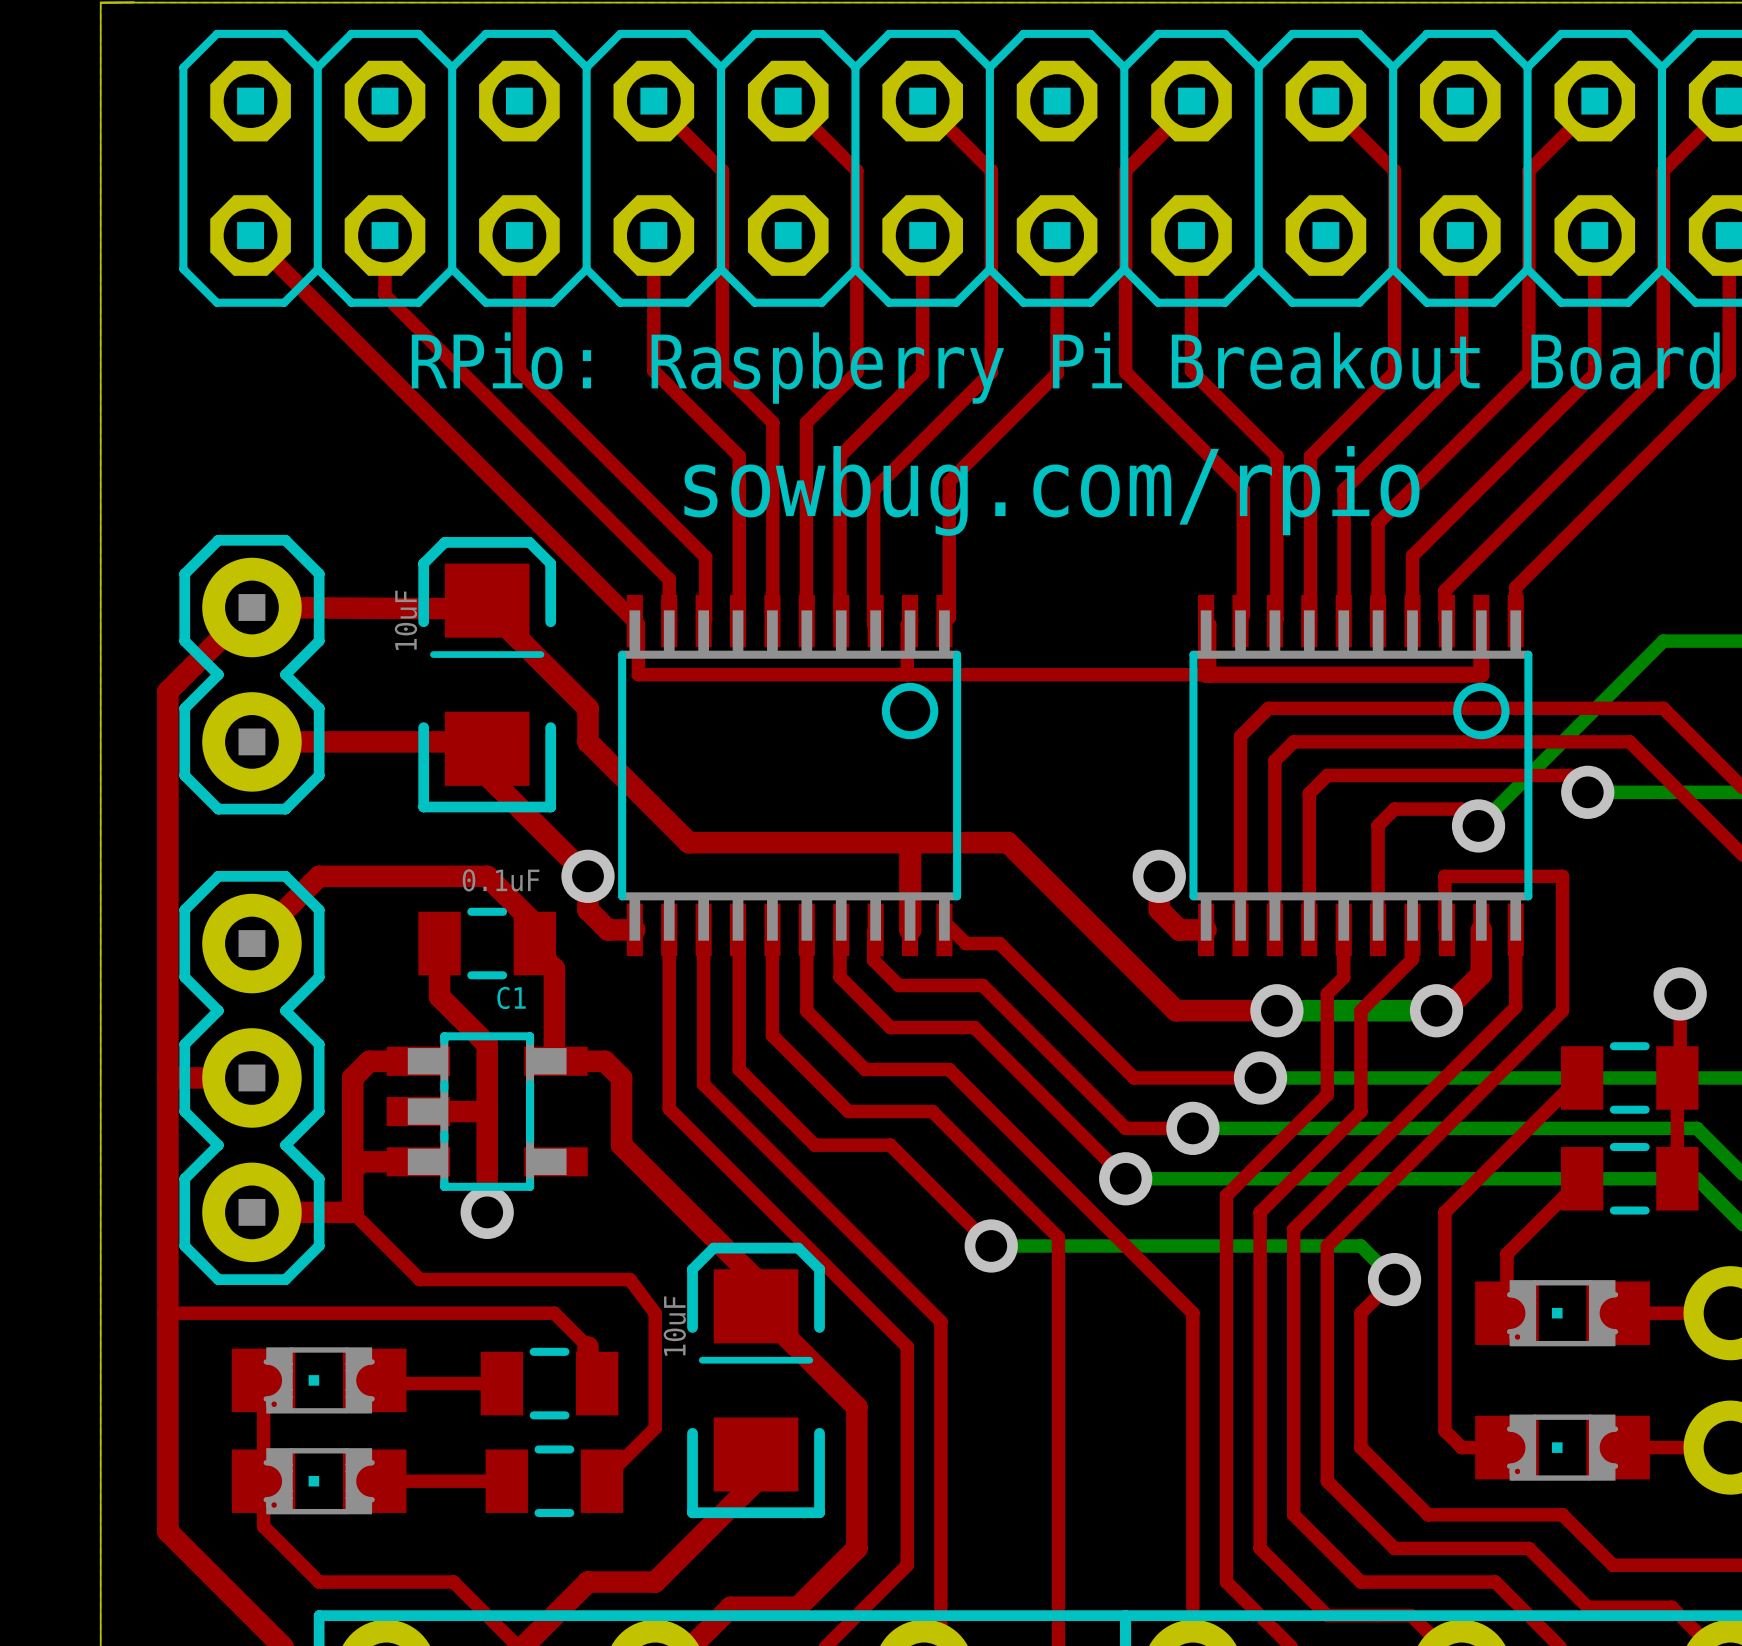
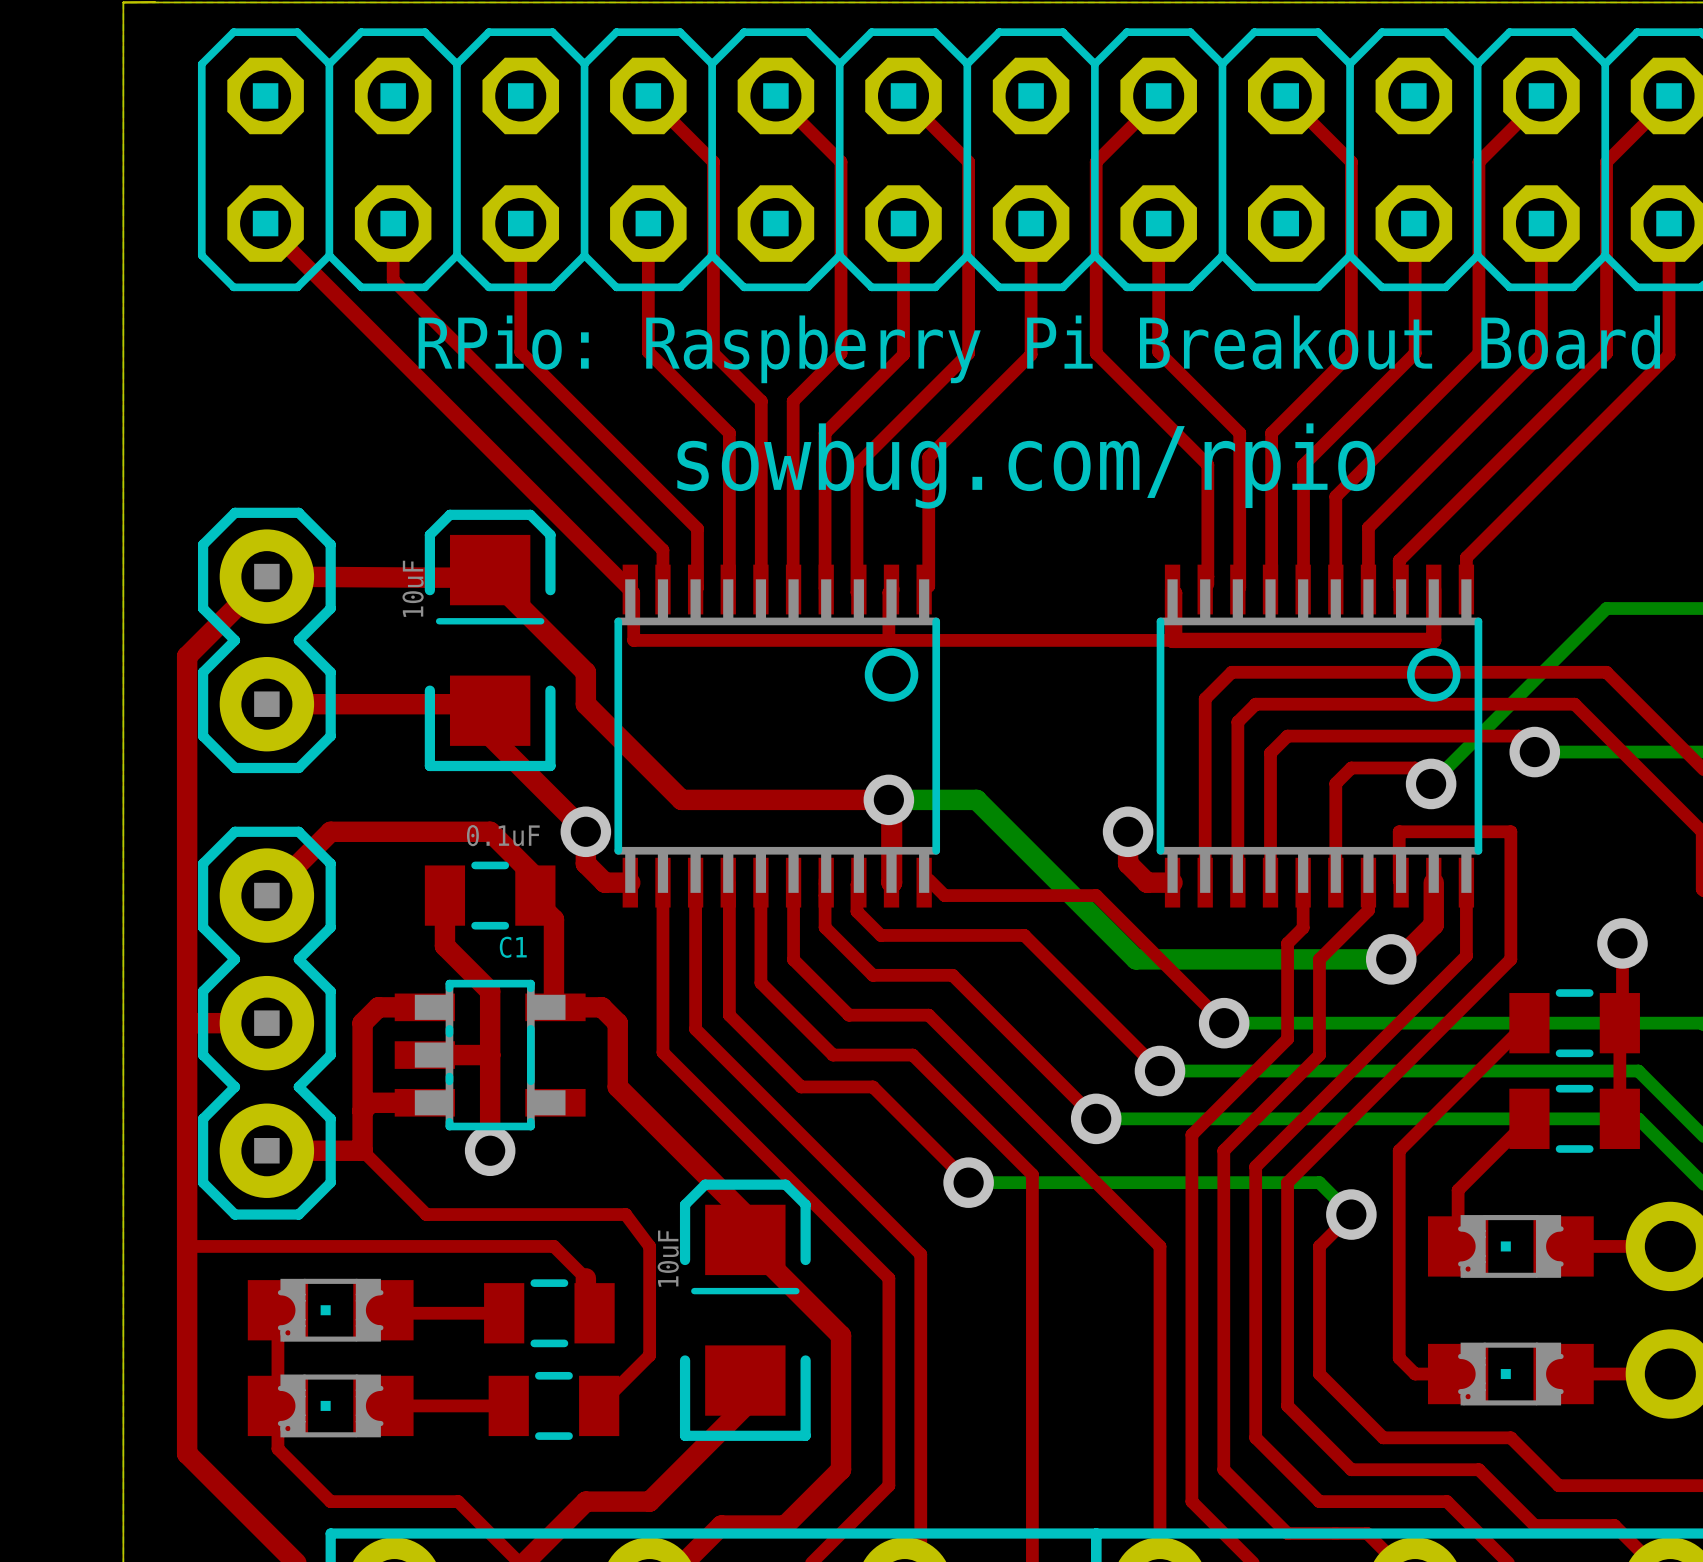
bottom track: none -> (888, 799) (976, 799) (1136, 959) (1239, 959)
via: none -> (888, 799)
top track: (910, 842) (1008, 842) (1176, 1010) (1276, 1010) -> none
top track: (999, 943) (1134, 1077) (1260, 1077) -> (976, 895) (1096, 895) (1223, 1023)
top track: (982, 985) (1125, 1128) (1192, 1128) -> (960, 935) (1024, 935) (1159, 1071)
via: (1276, 1010) -> none

